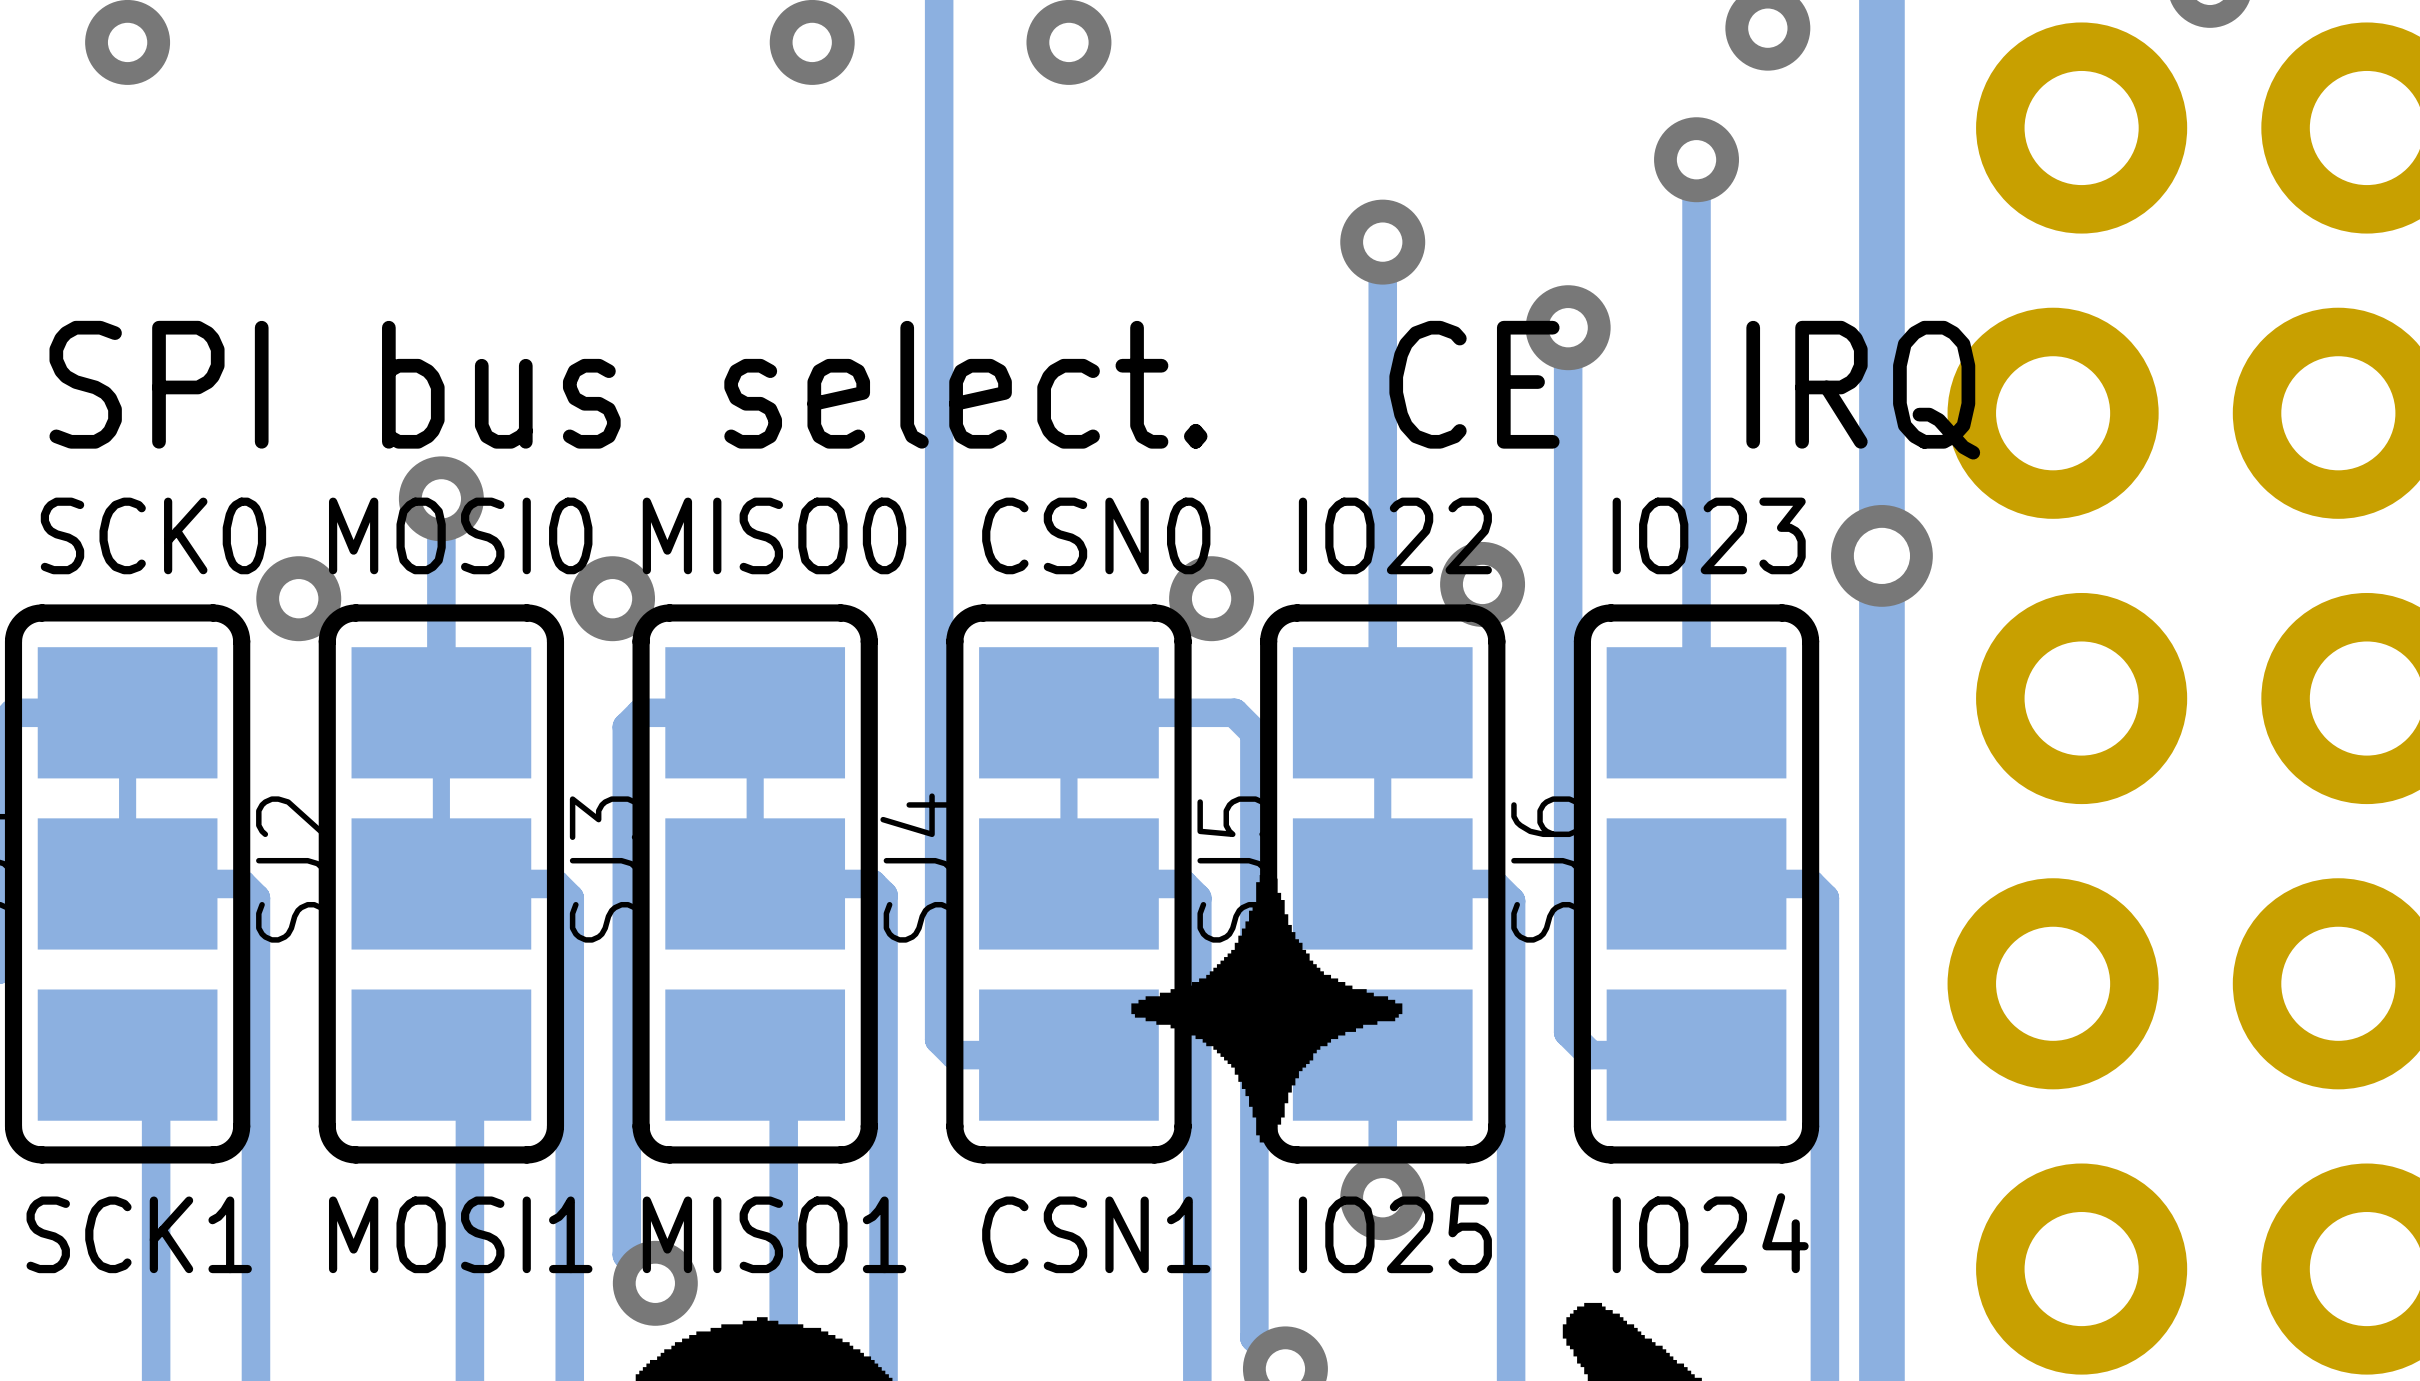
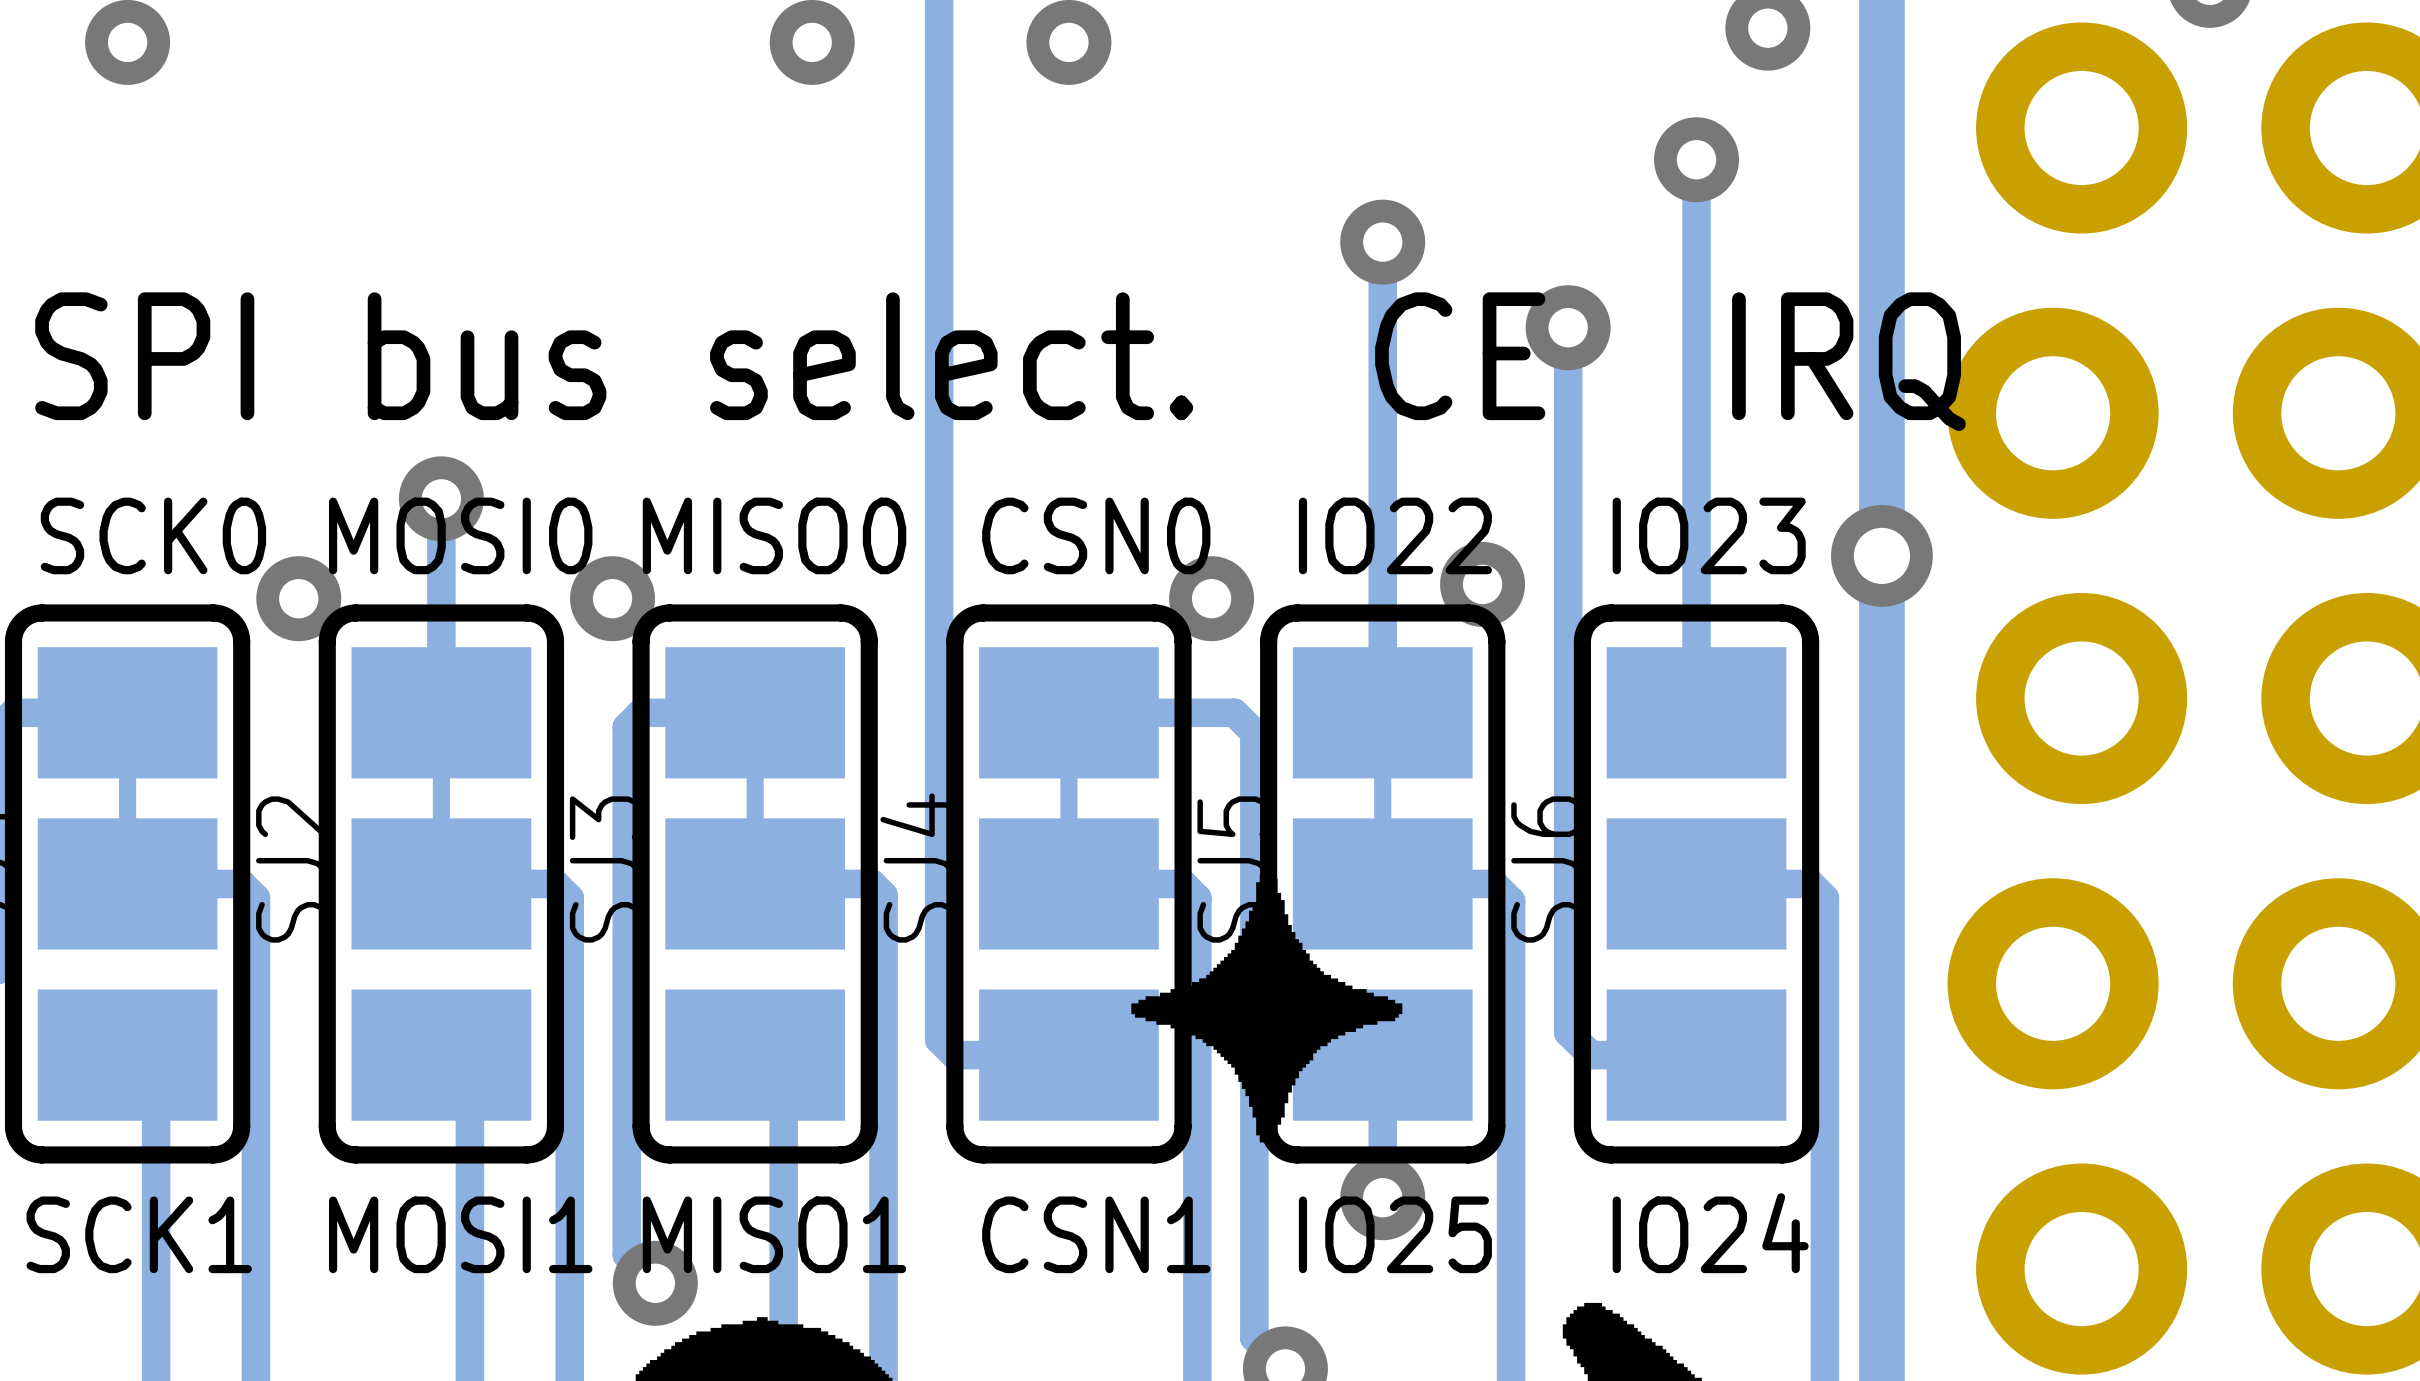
text position: SPI bus select. CE IRQ (1014, 390) -> SPI bus select. CE IRQ (1000, 361)

